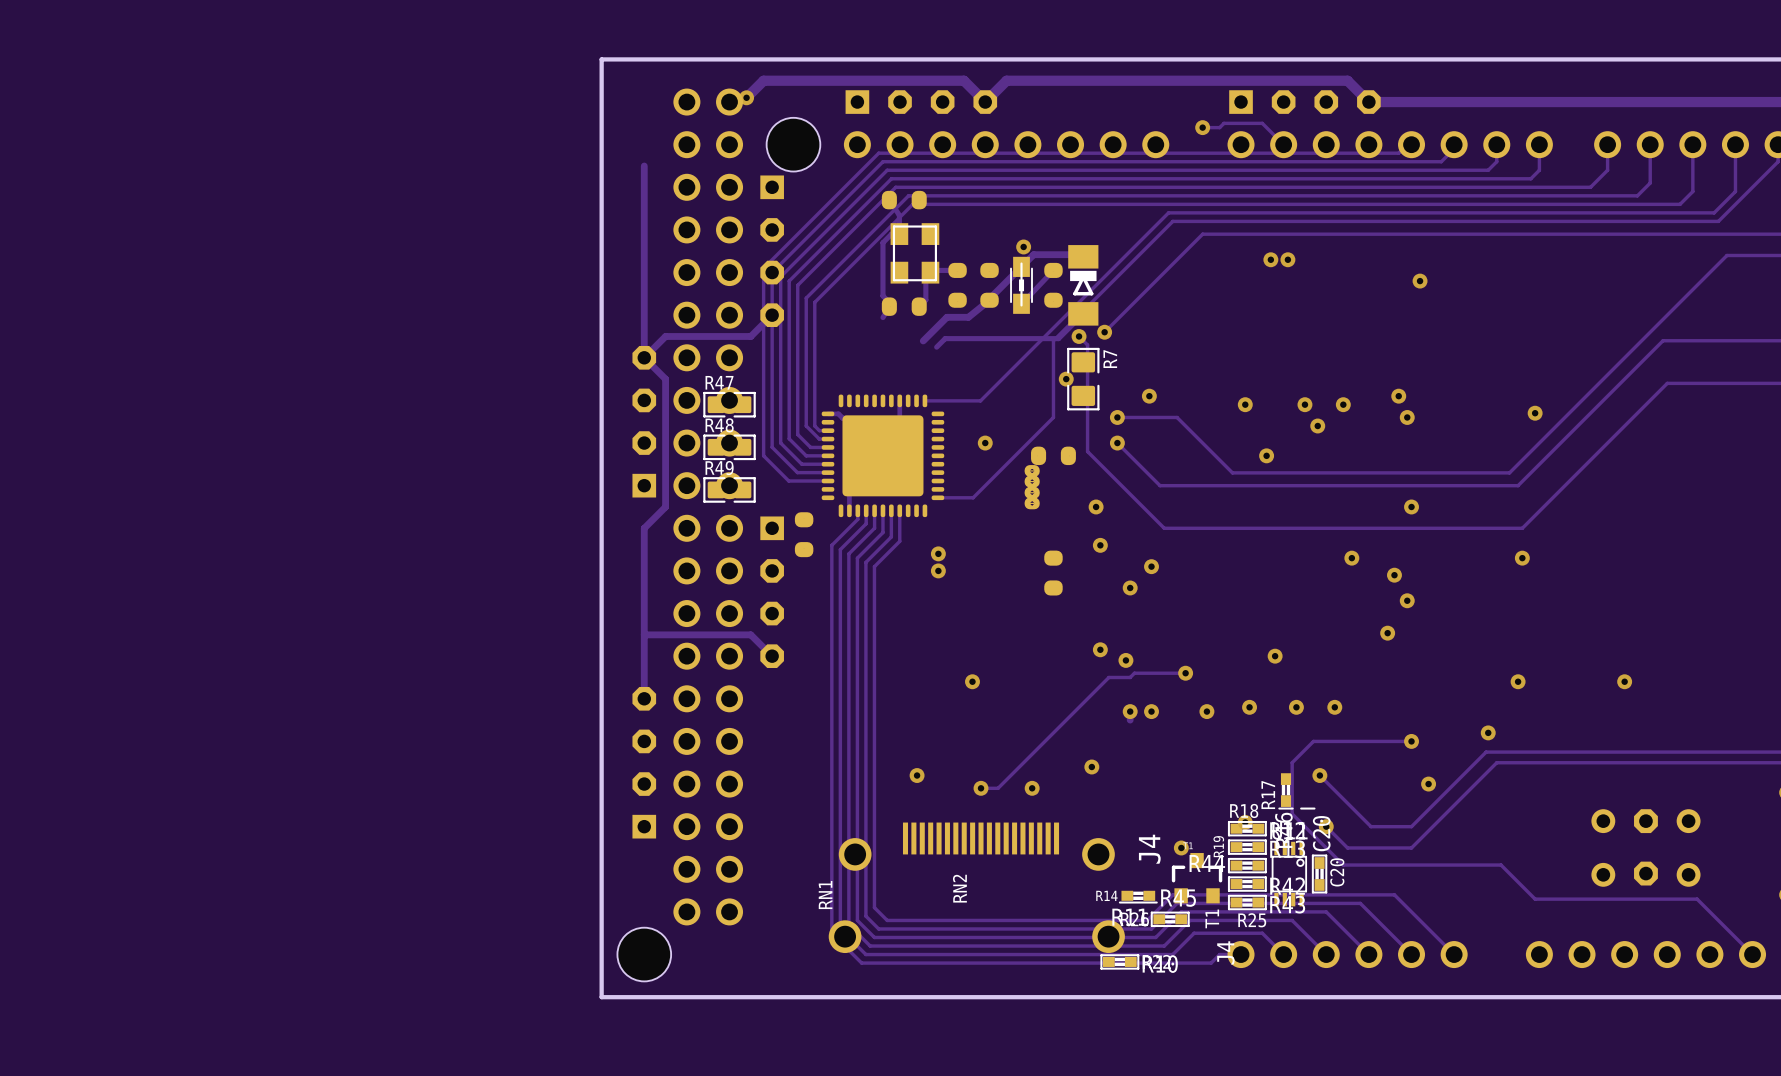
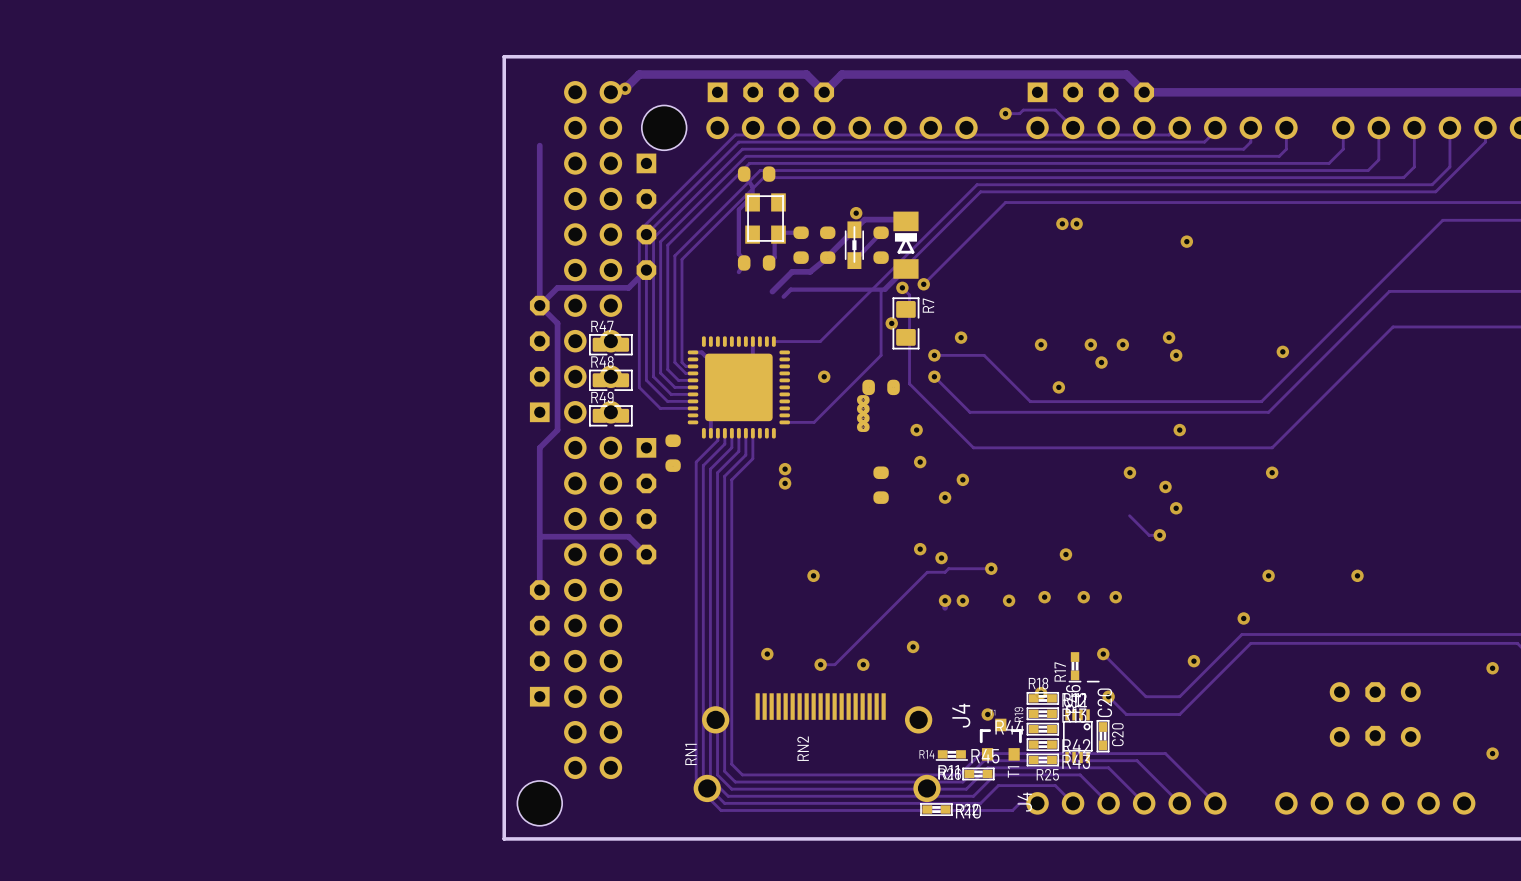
track: none -> (1129, 515) (1149, 535) (1159, 535)
track: (1411, 741) (1313, 741) (1292, 762) (1292, 813) (1343, 865) (1501, 865) (1535, 899) (1697, 899) (1752, 954) -> none
via: (1411, 741) -> none

